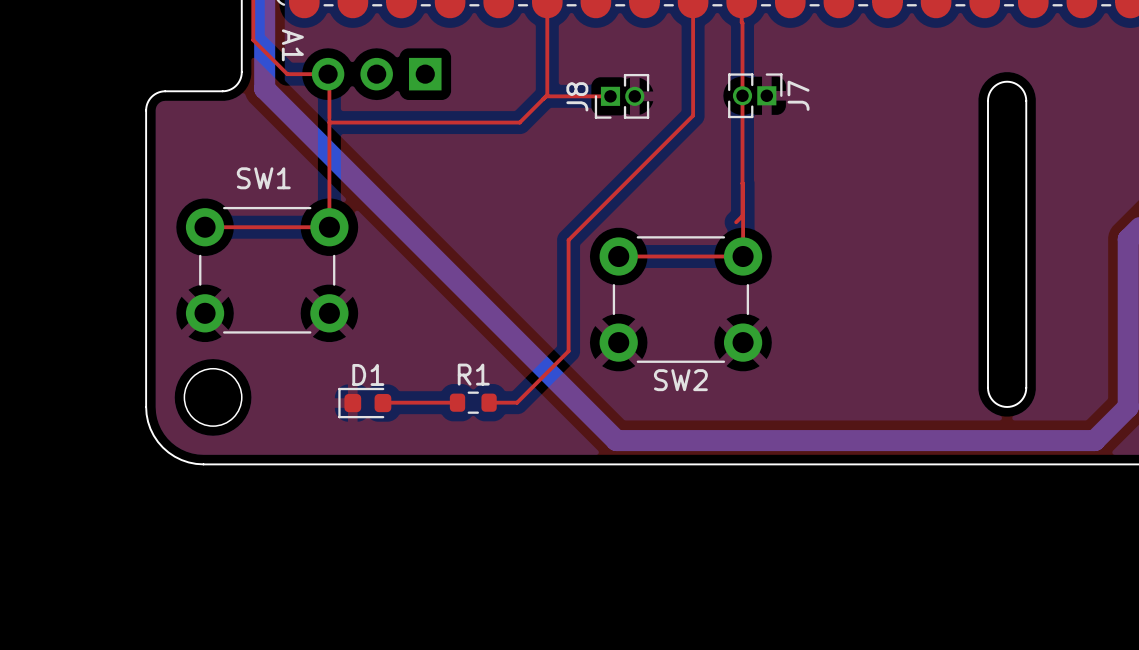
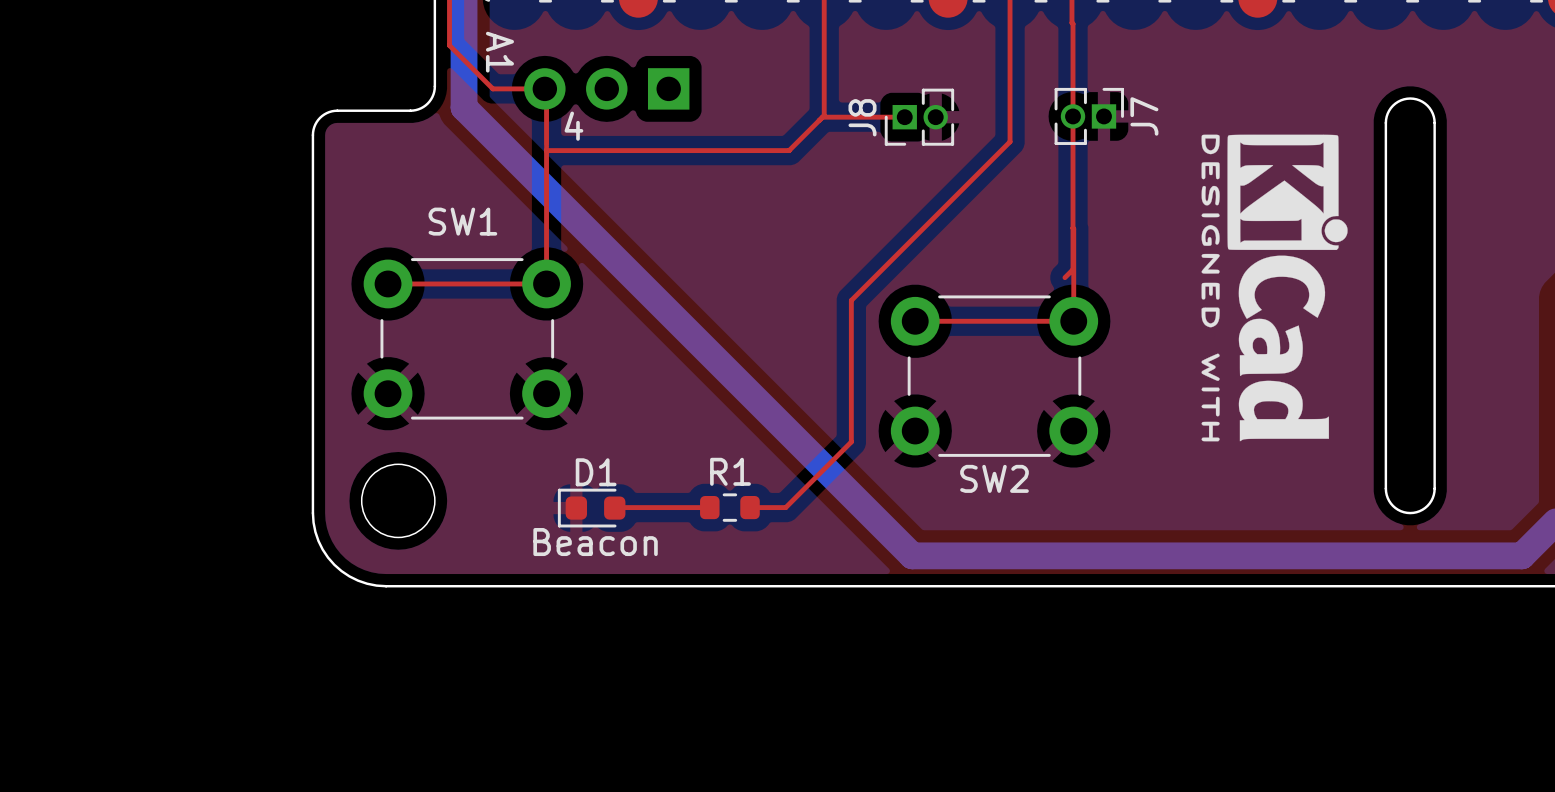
part value: none -> 4 (573, 126)
drawing: none -> [1201, 134, 1348, 442]
D1 value: none -> Beacon (595, 542)

